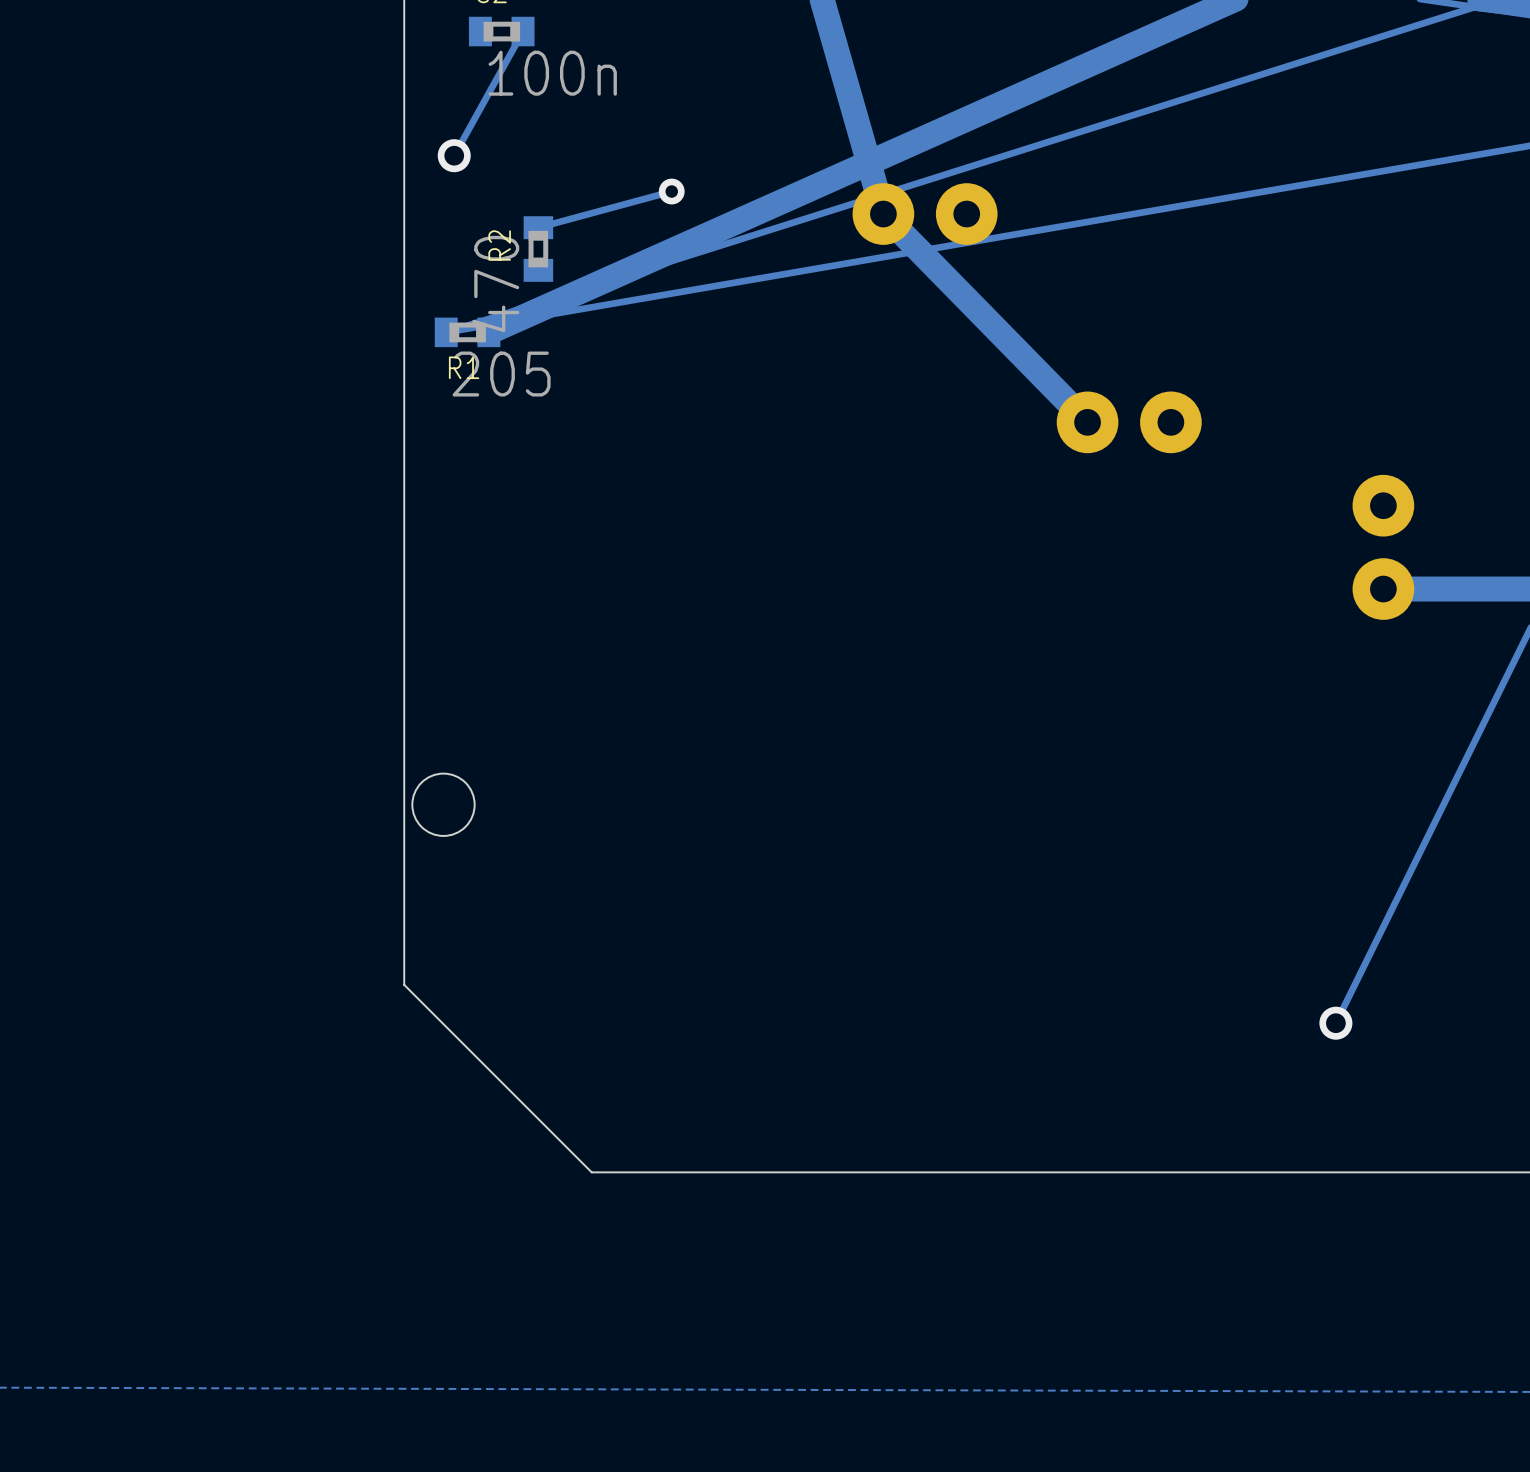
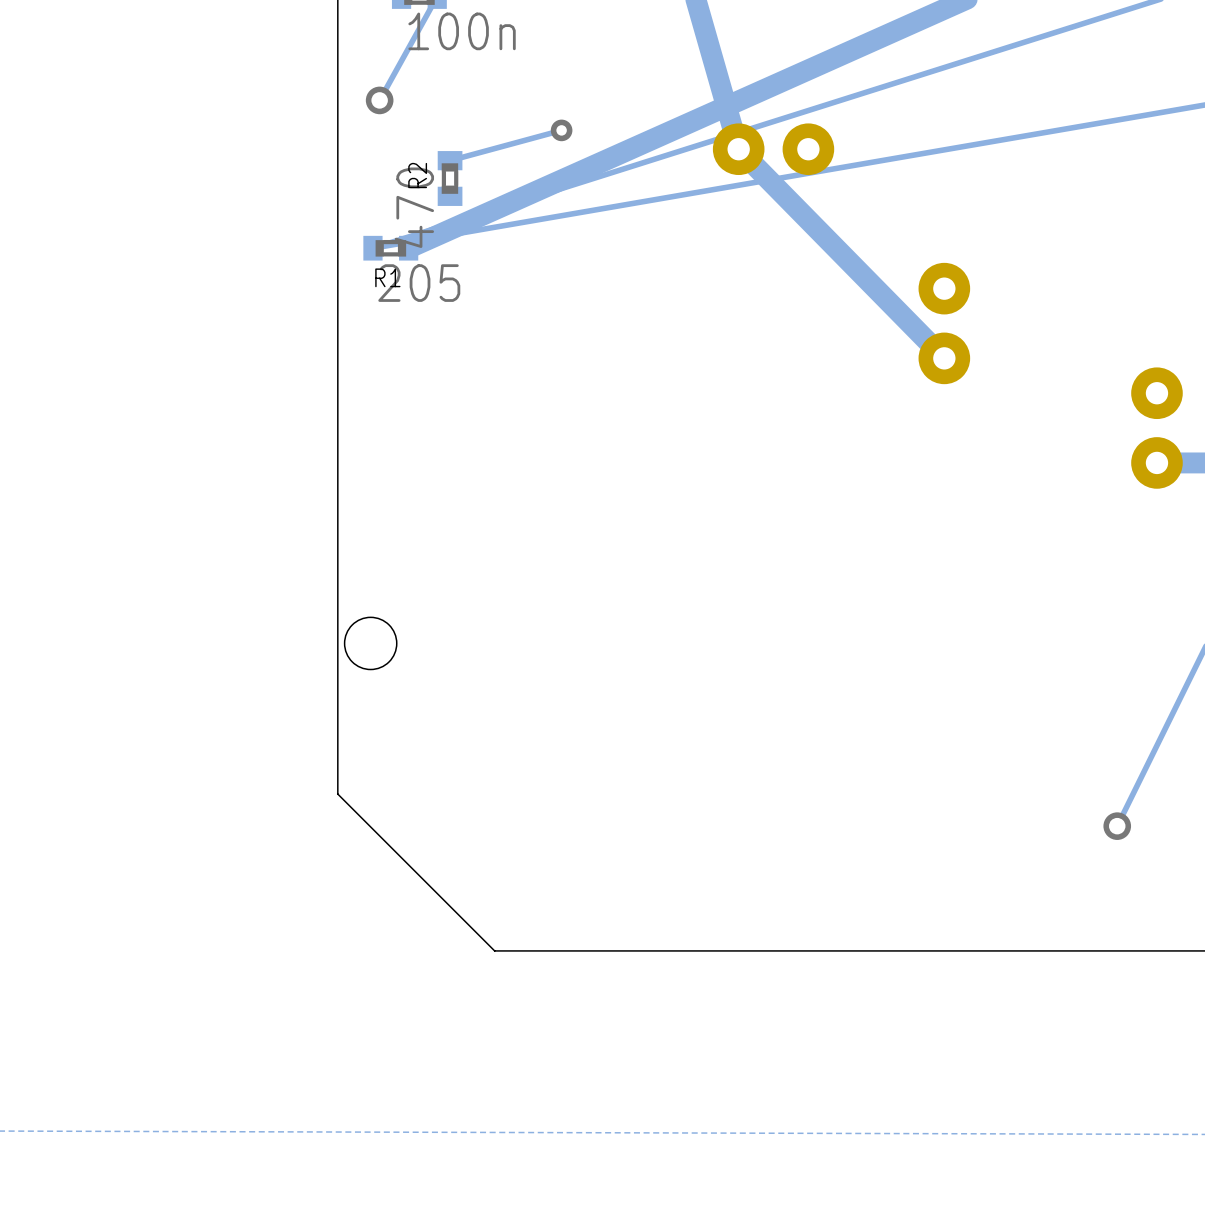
track: (883, 214) (1087, 422) -> (738, 149) (944, 358)
part rotation: 0° (1129, 422) -> 90° clockwise (944, 323)

